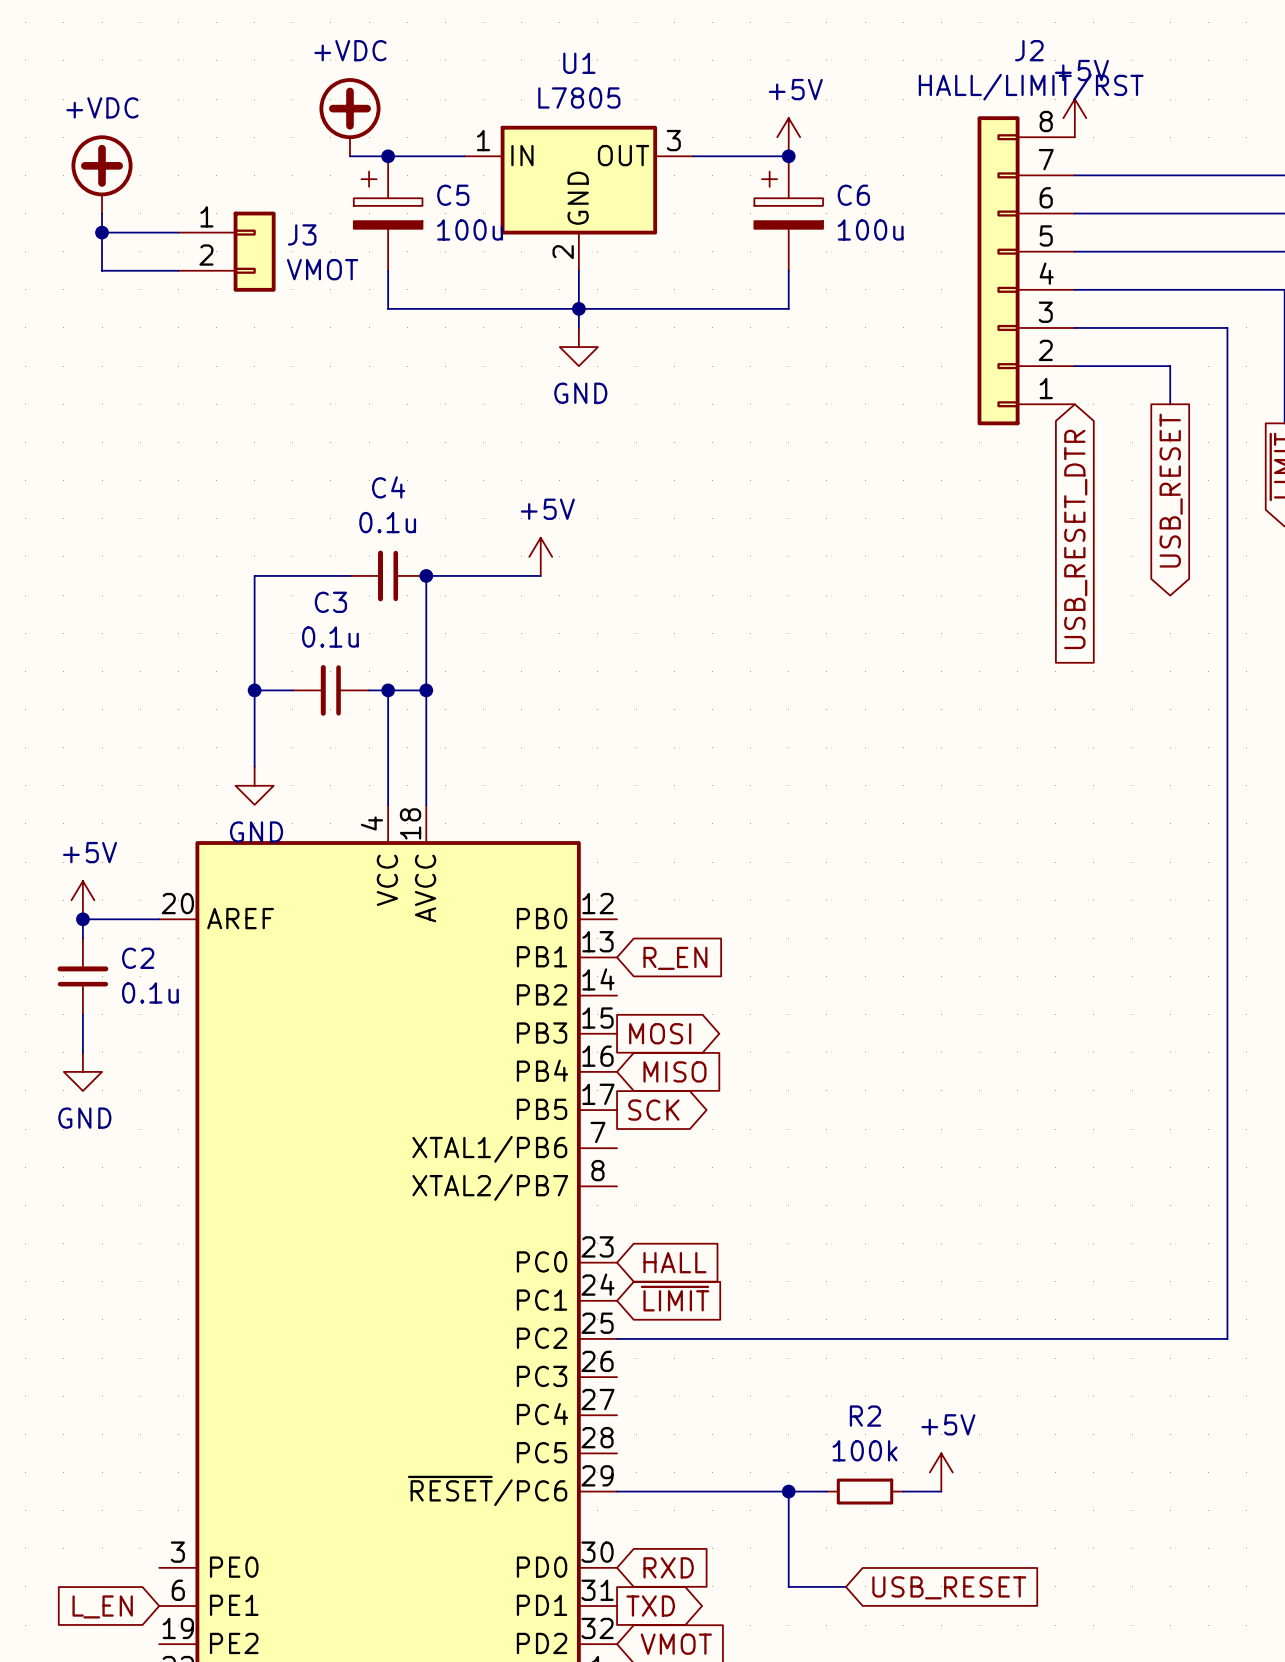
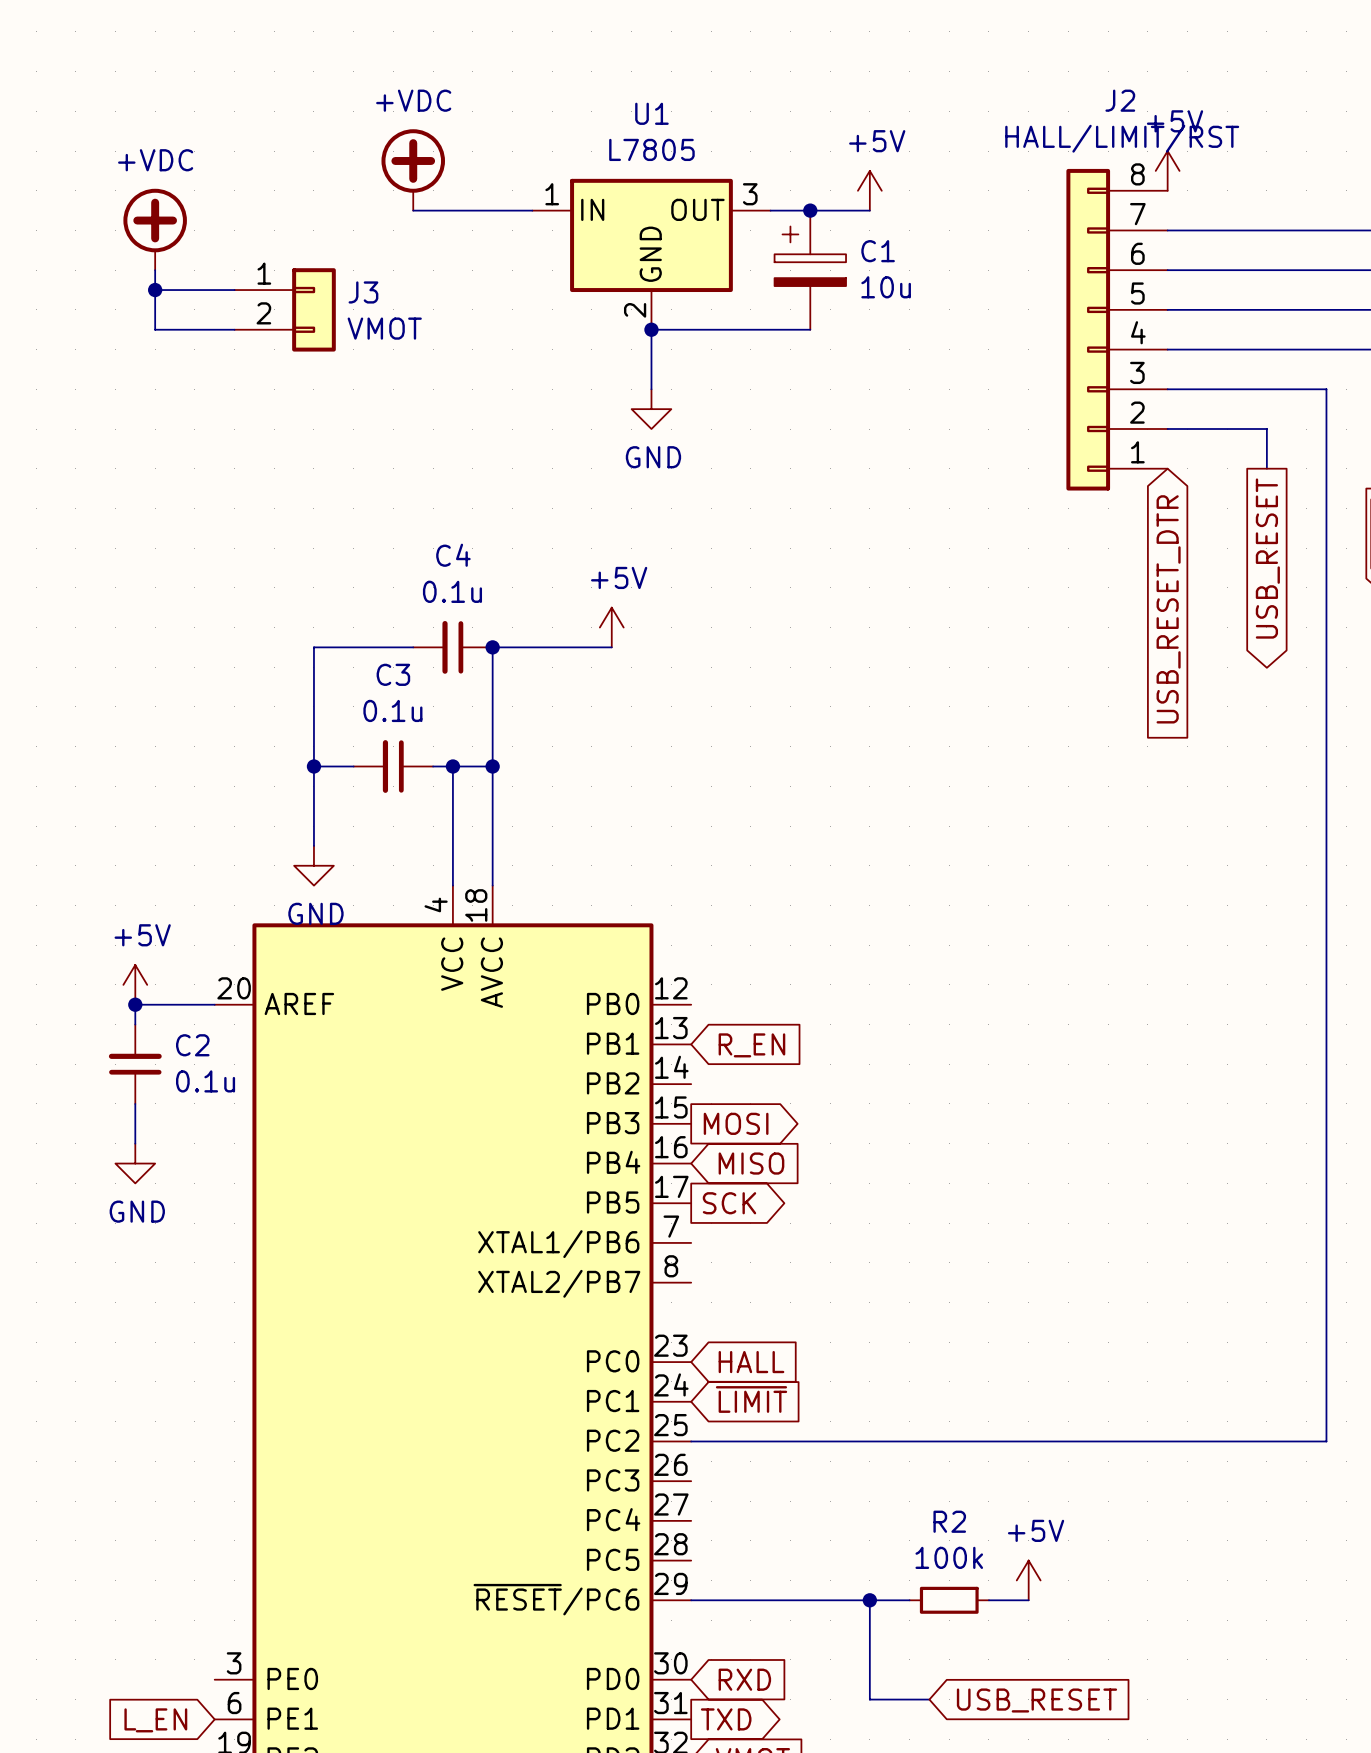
junction: (388, 156) -> none
junction position: (788, 156) -> (810, 210)
C5: 100u (388, 213) -> none
C1: none -> 10u (810, 270)
C6: 100u (788, 213) -> none
wire: (388, 270) (388, 308) (788, 308) (788, 270) -> none
wire: none -> (651, 329) (810, 329)
junction position: (578, 308) -> (651, 329)

